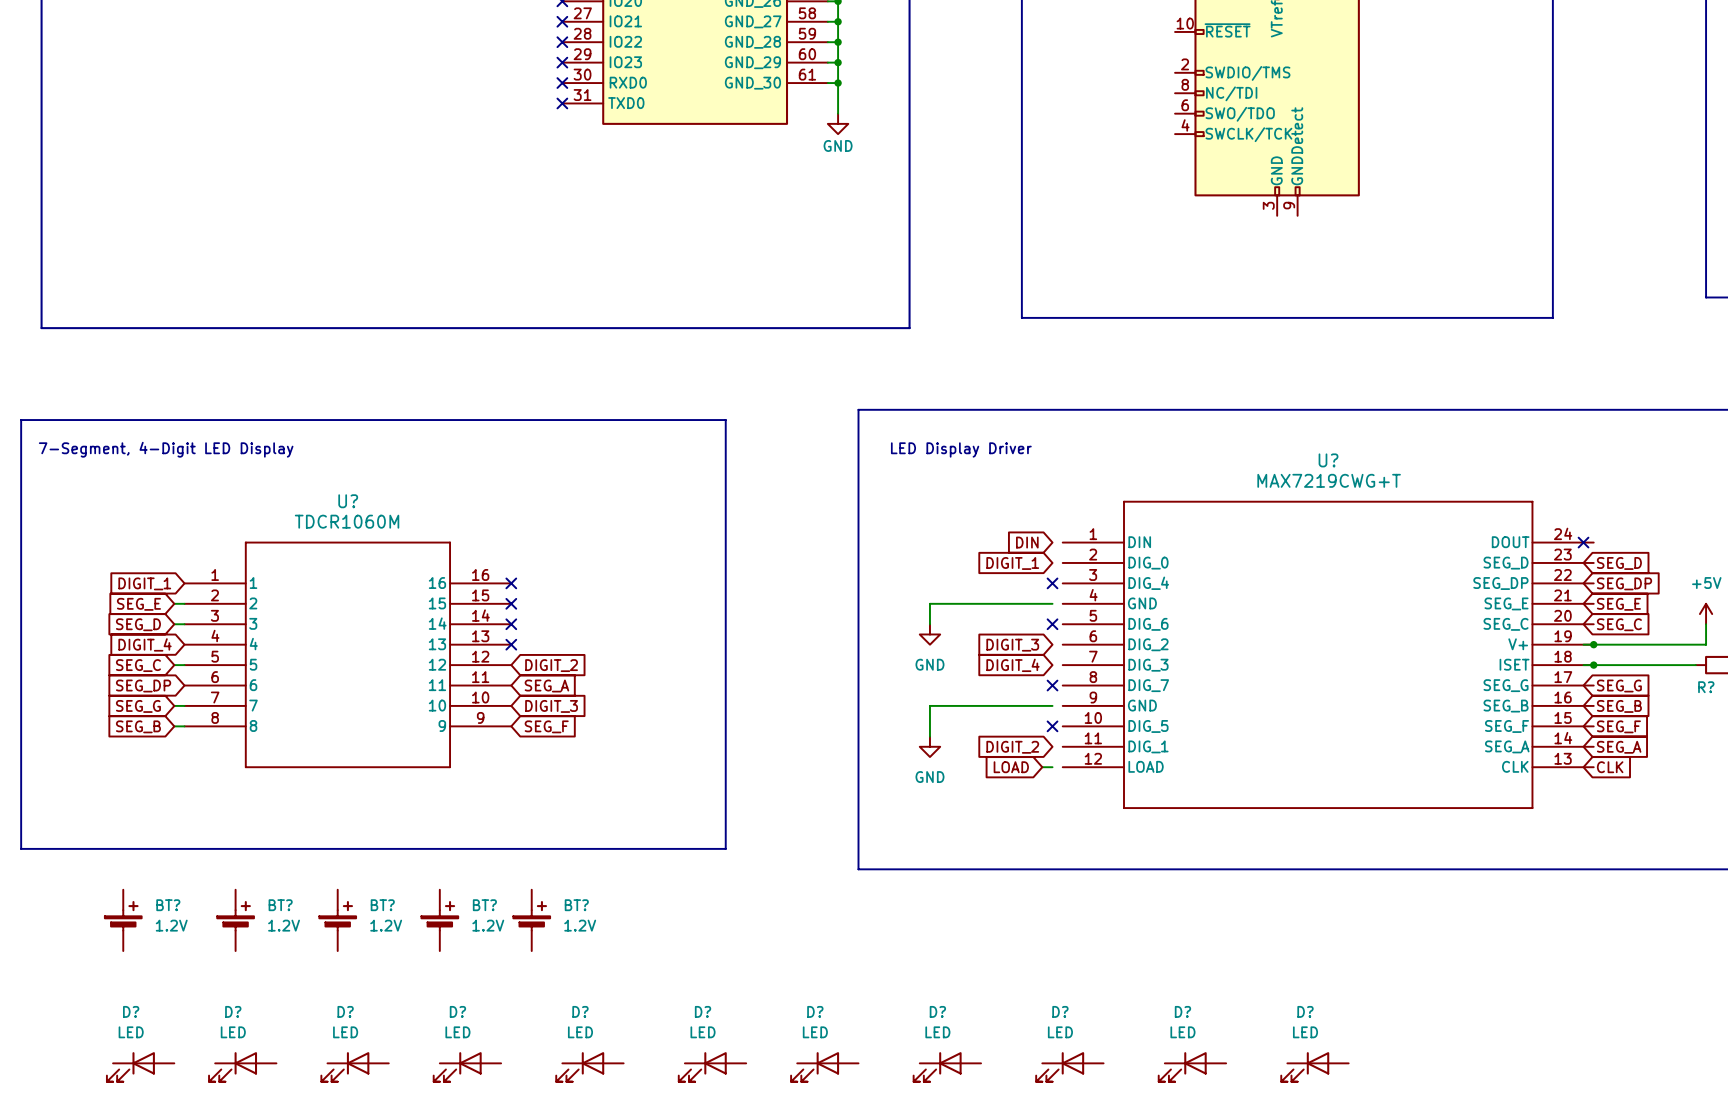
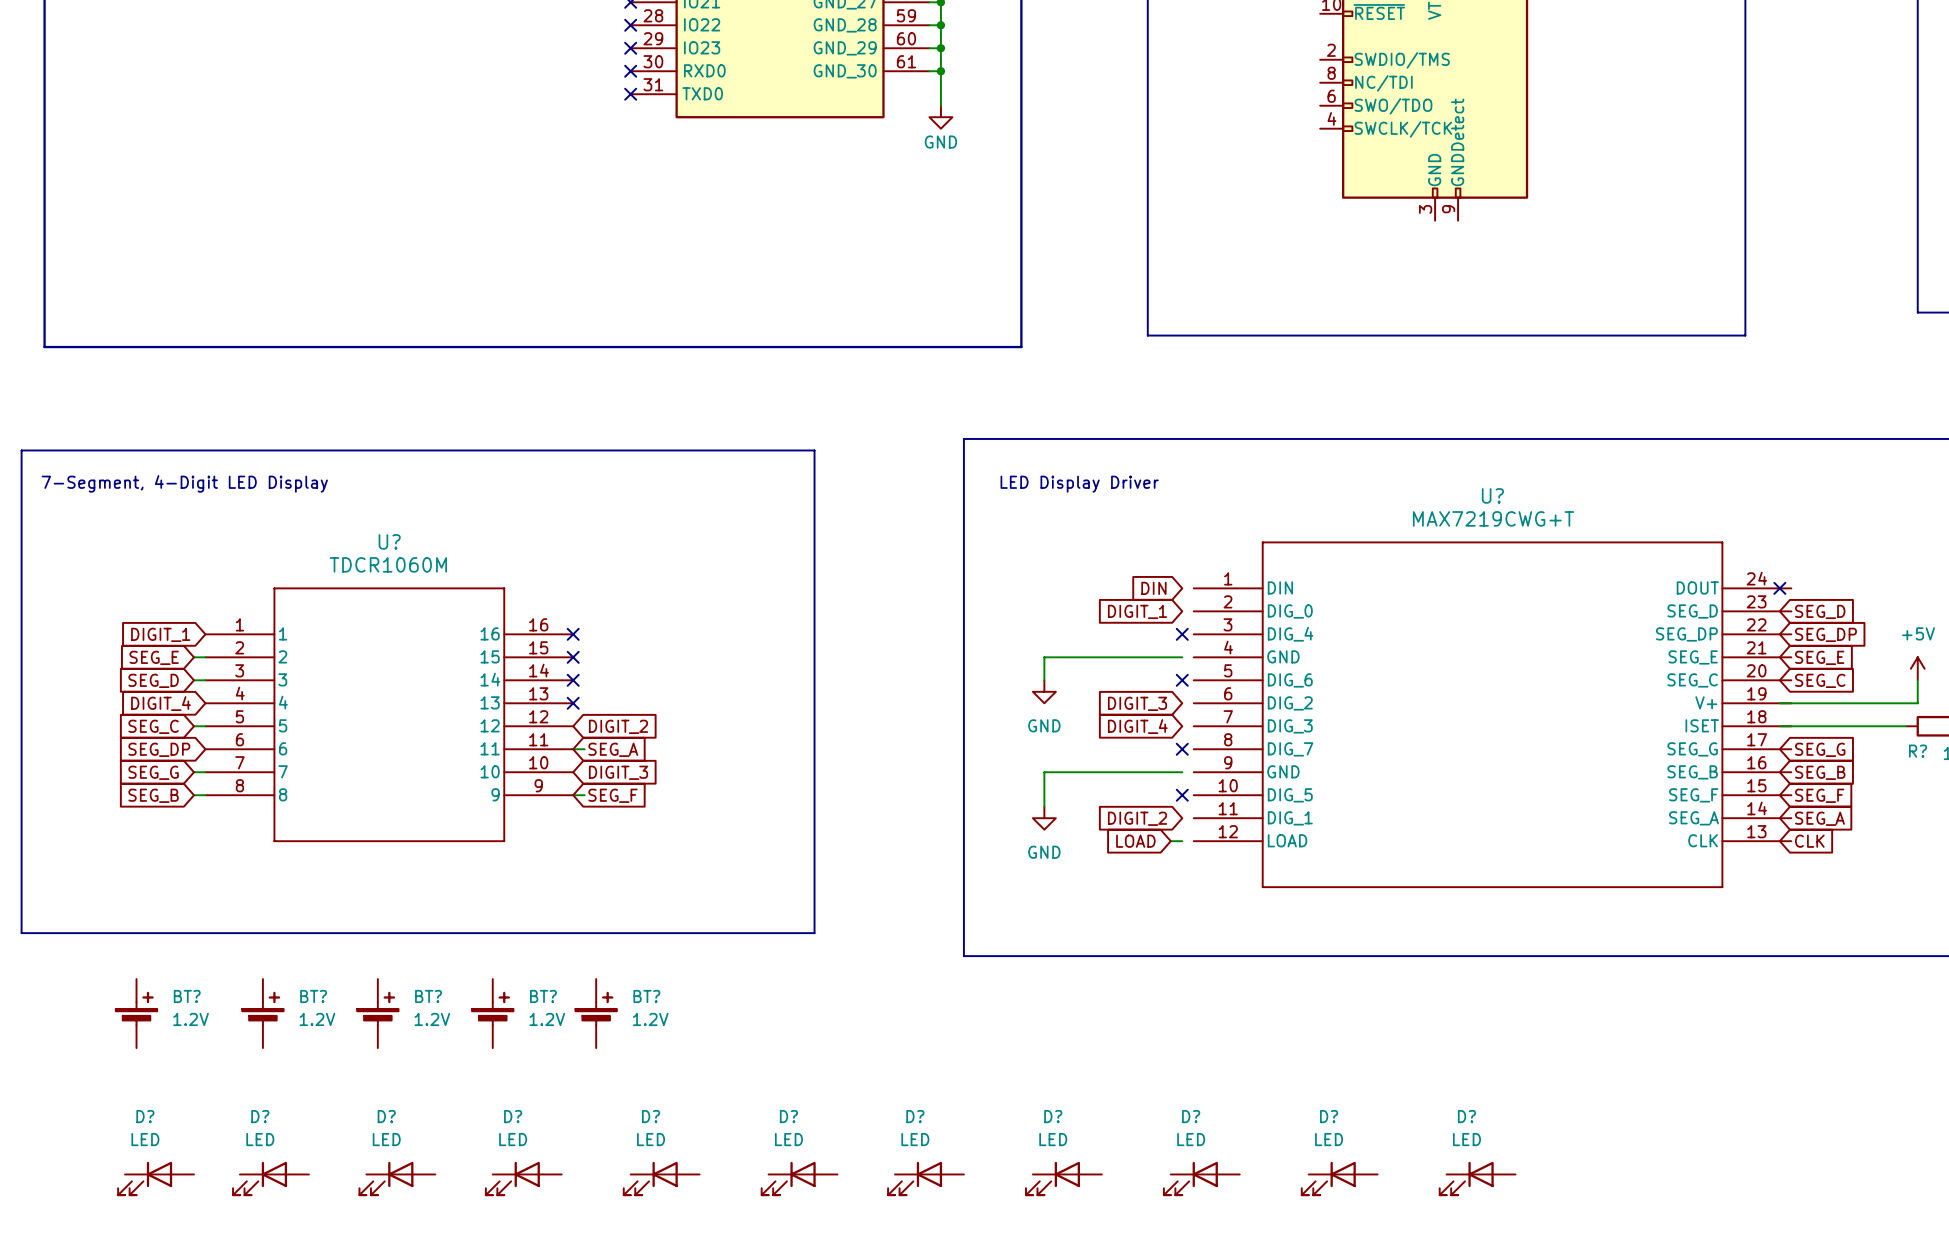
junction: (1593, 644) -> none
junction: (1593, 665) -> none
wire: none -> (573, 749) (584, 749)
wire: none -> (573, 795) (584, 795)

